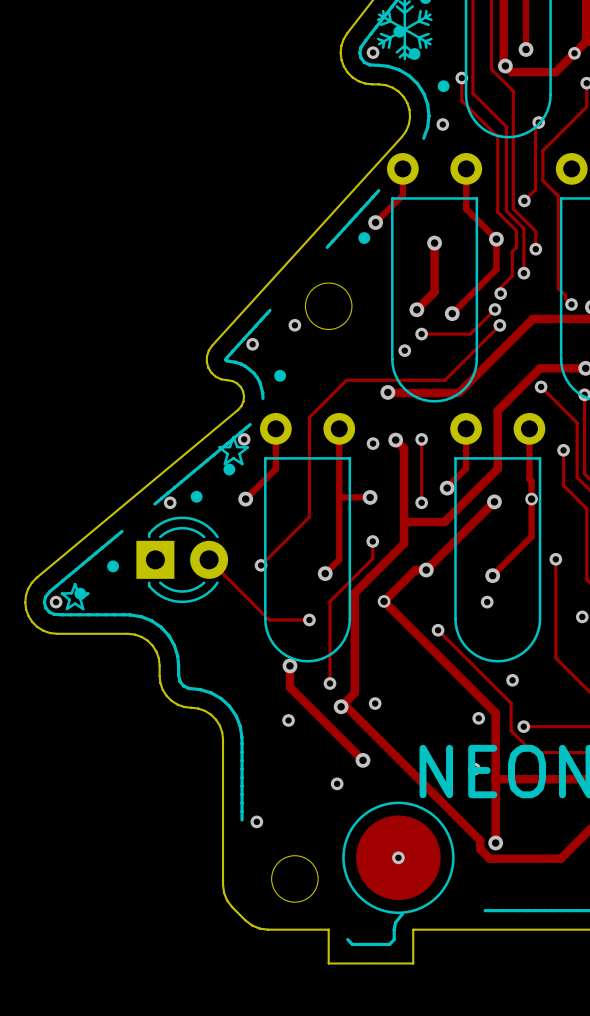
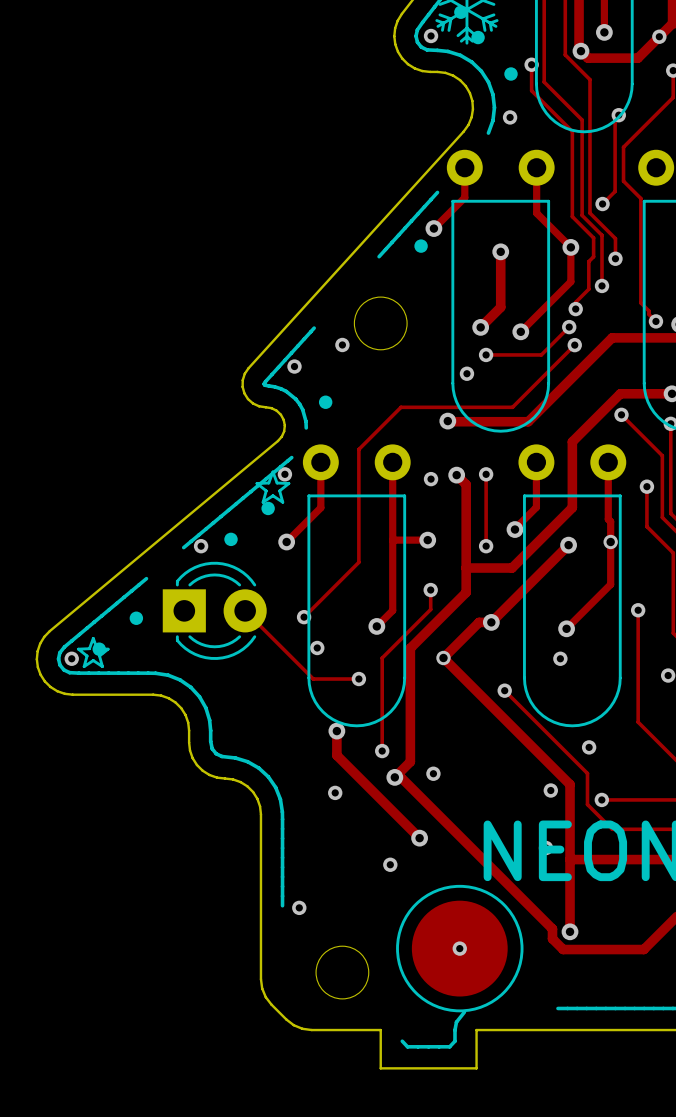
via: none -> (317, 647)

